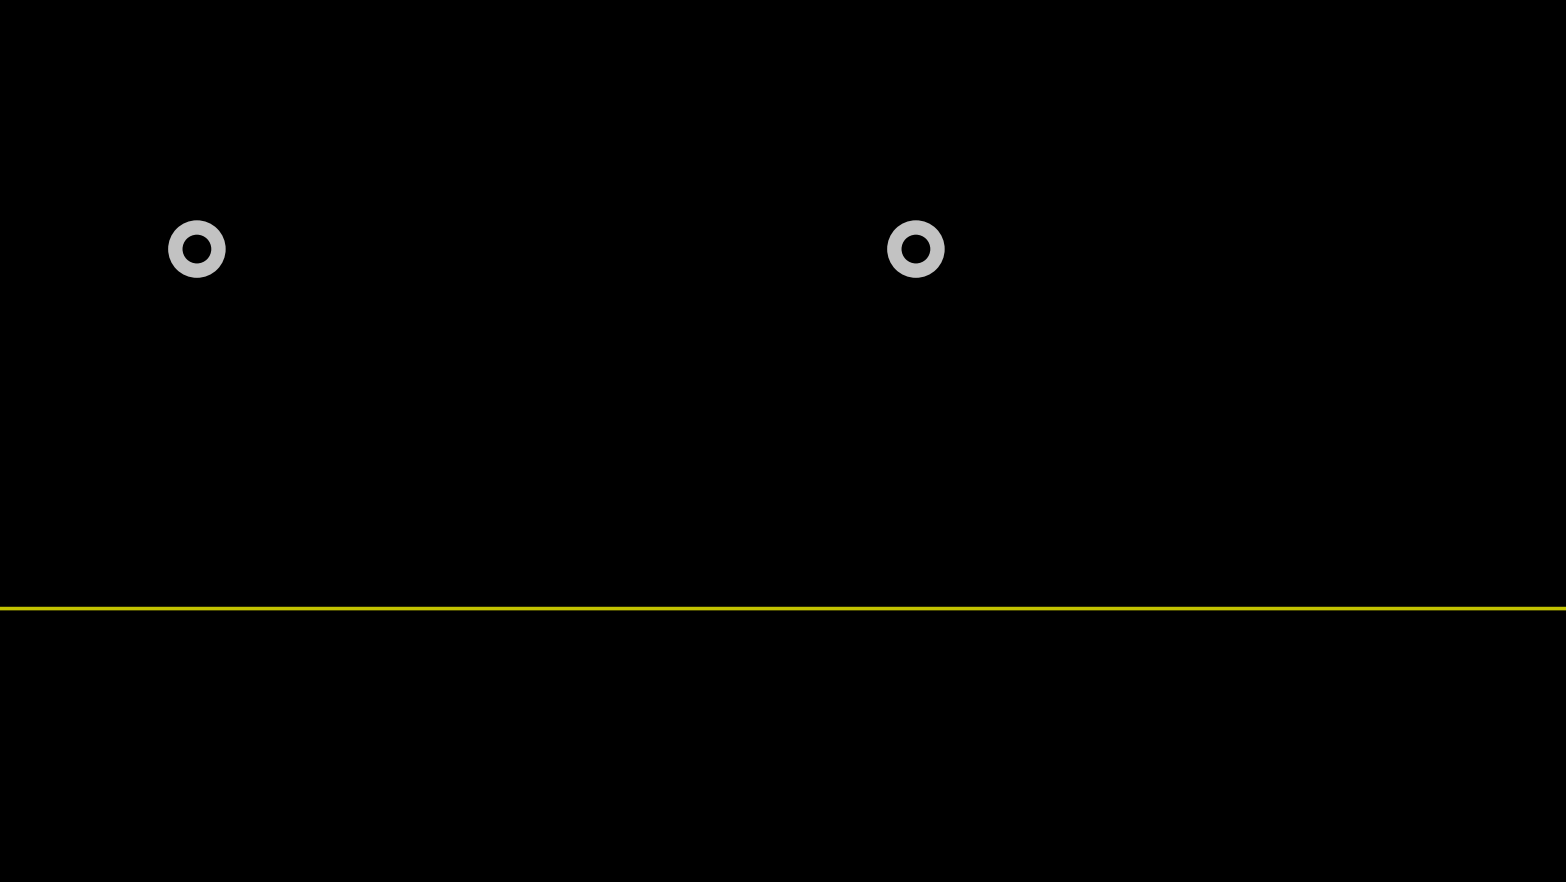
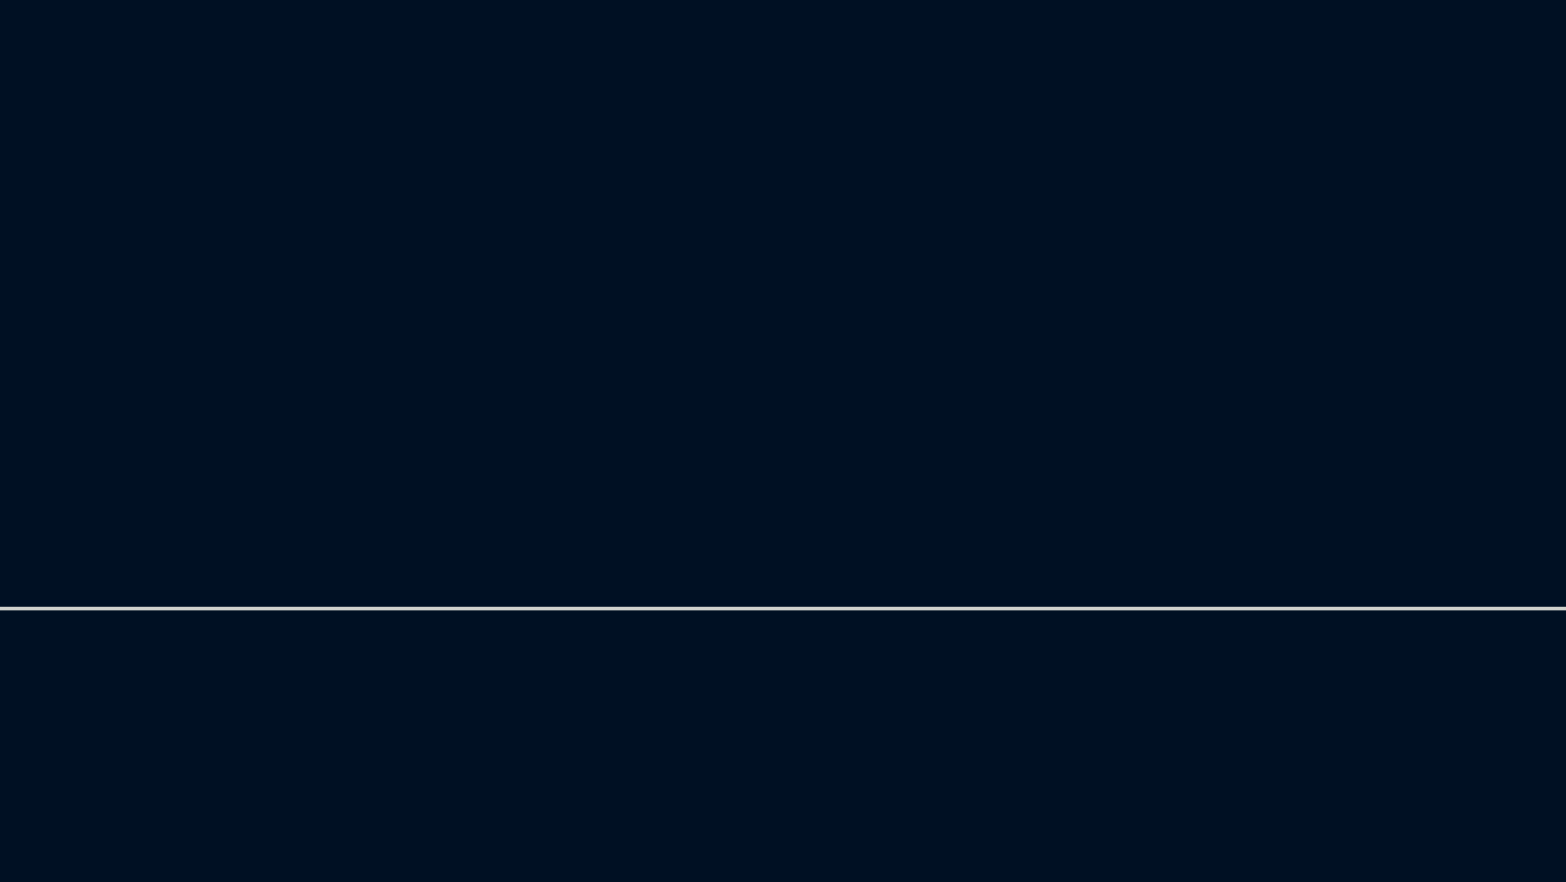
via: (196, 249) -> none
via: (915, 249) -> none

